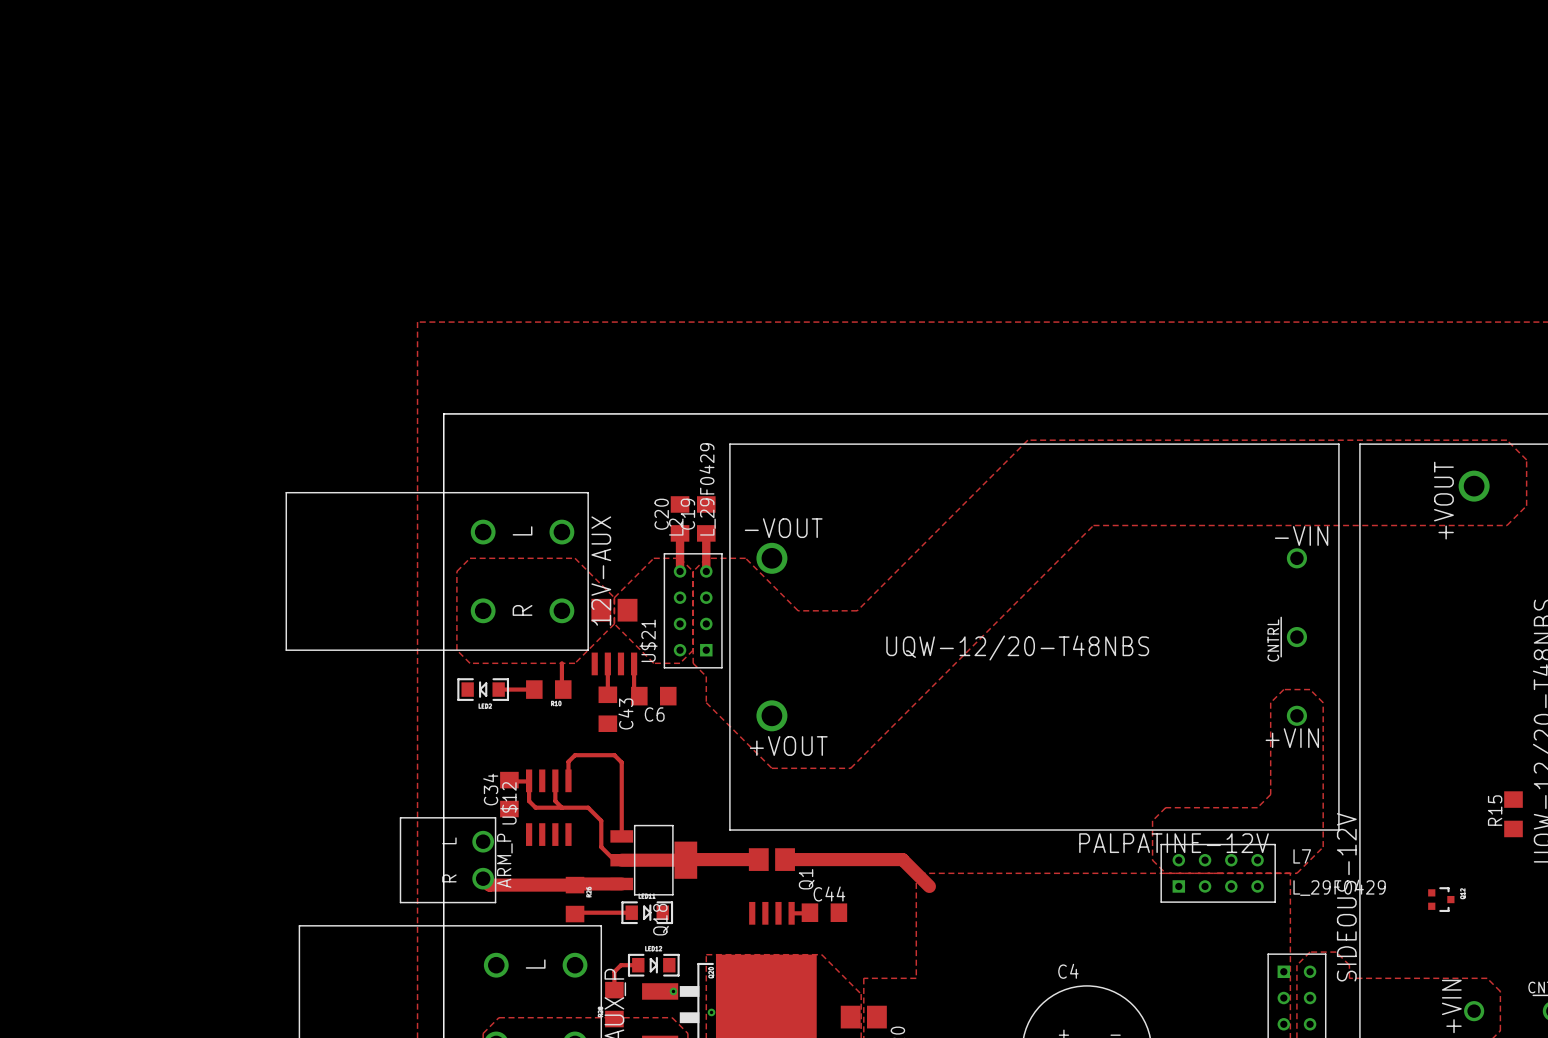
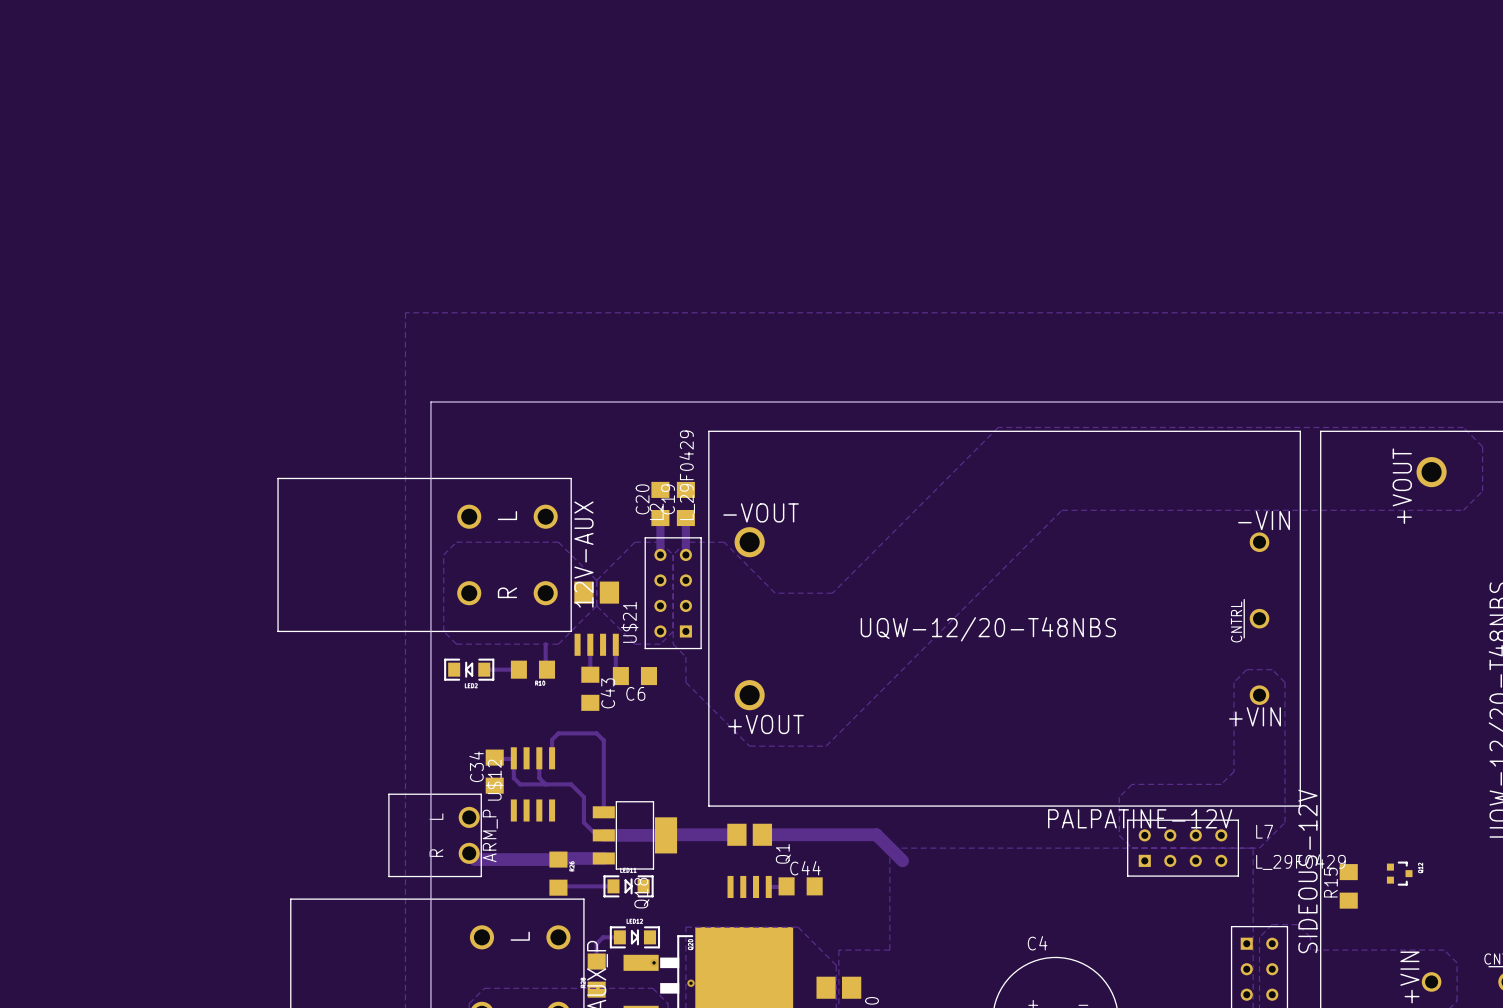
R15 position: (1513, 814) -> (1348, 886)

